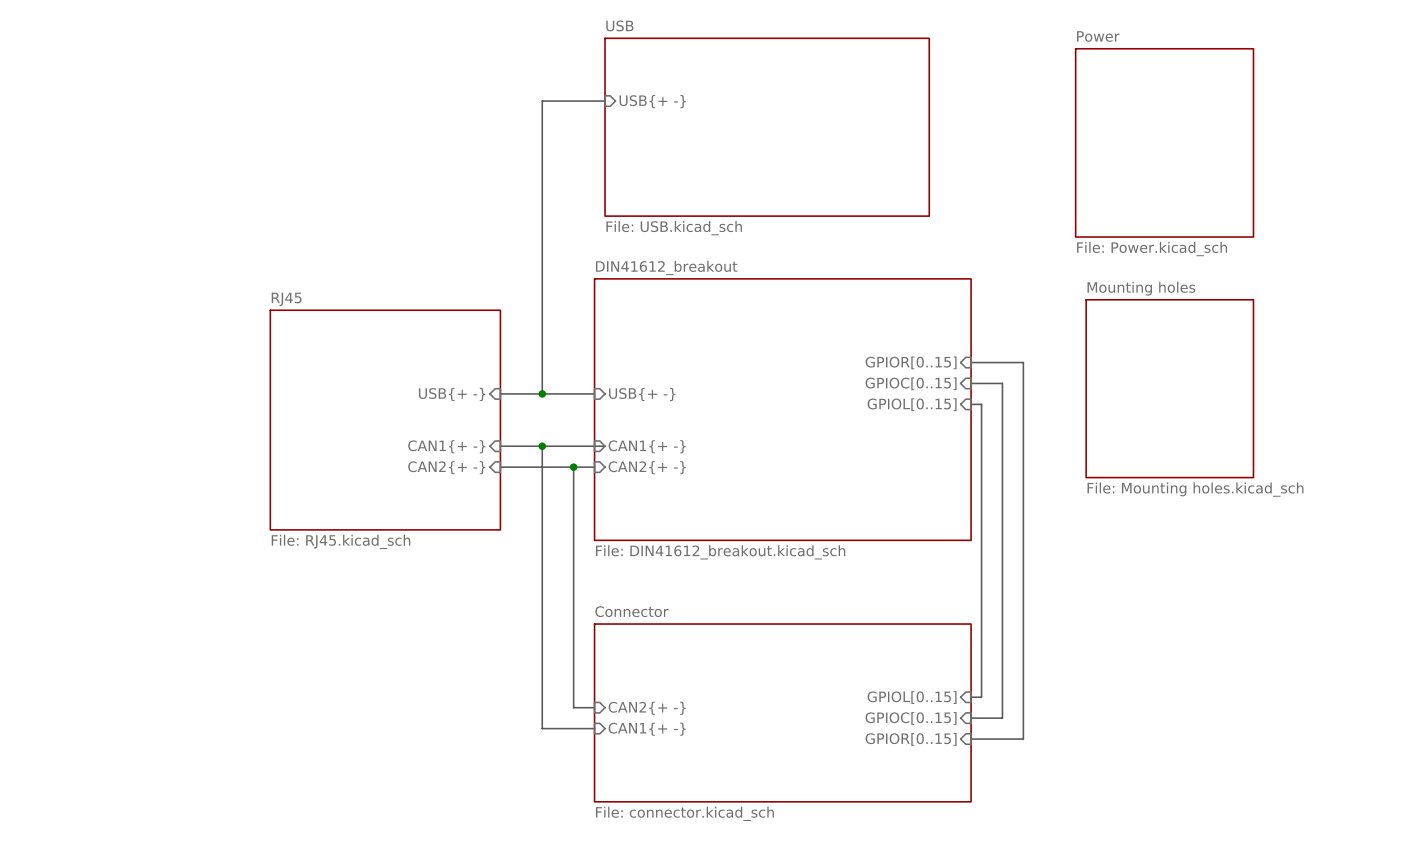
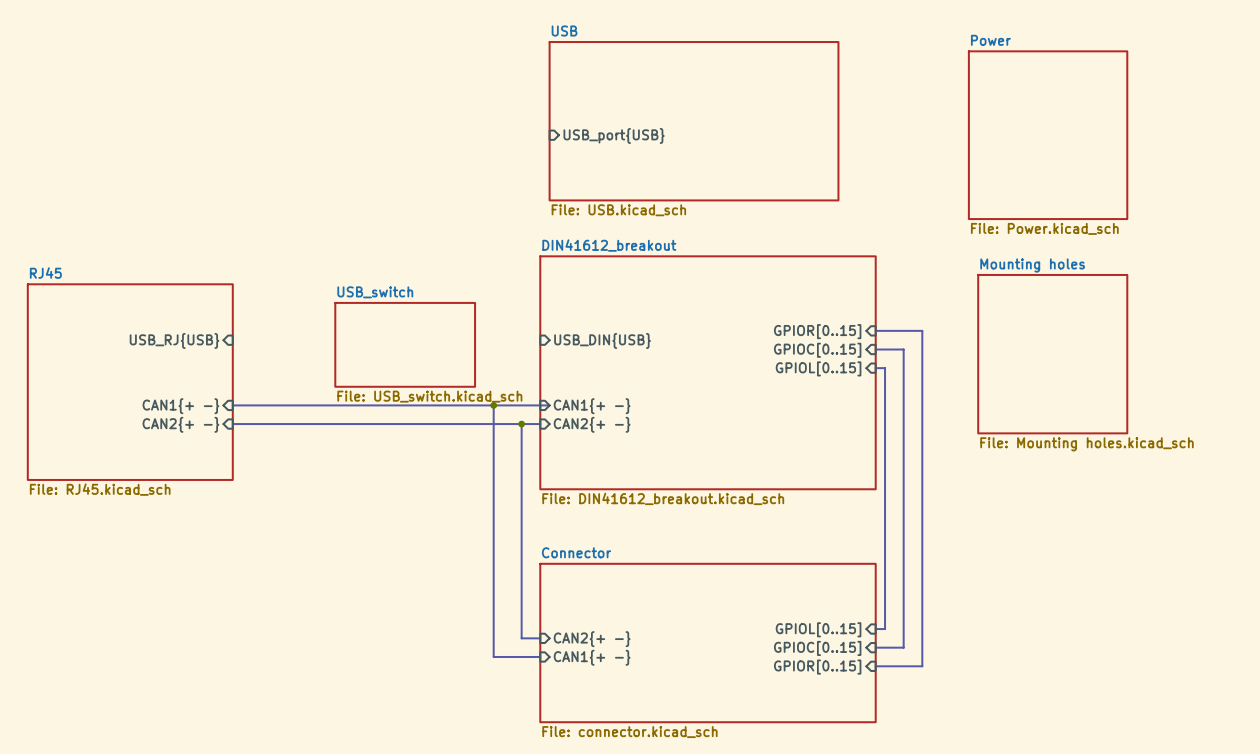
bus: (605, 101) (542, 101) (542, 393) -> none
sheet pin: USB{+ -} (652, 101) -> none
sheet pin: none -> USB_port{USB} (614, 135)
sheet pin: none -> USB_RJ{USB} (174, 340)
sheet pin: none -> USB_DIN{USB} (602, 340)
sheet USB_switch: none -> File: USB_switch.kicad_sch (405, 344)
bus: (500, 393) (594, 393) -> none
junction: (542, 393) -> none
sheet pin: USB{+ -} (452, 394) -> none
sheet pin: USB{+ -} (642, 394) -> none
sheet RJ45 position: (385, 420) -> (130, 382)
sheet pin: none -> CAN1{+ -} (180, 406)
bus: none -> (232, 405) (456, 405)
sheet pin: CAN1{+ -} (446, 446) -> none
sheet pin: none -> CAN2{+ -} (180, 424)
bus: none -> (232, 424) (456, 424)
sheet pin: CAN2{+ -} (446, 467) -> none

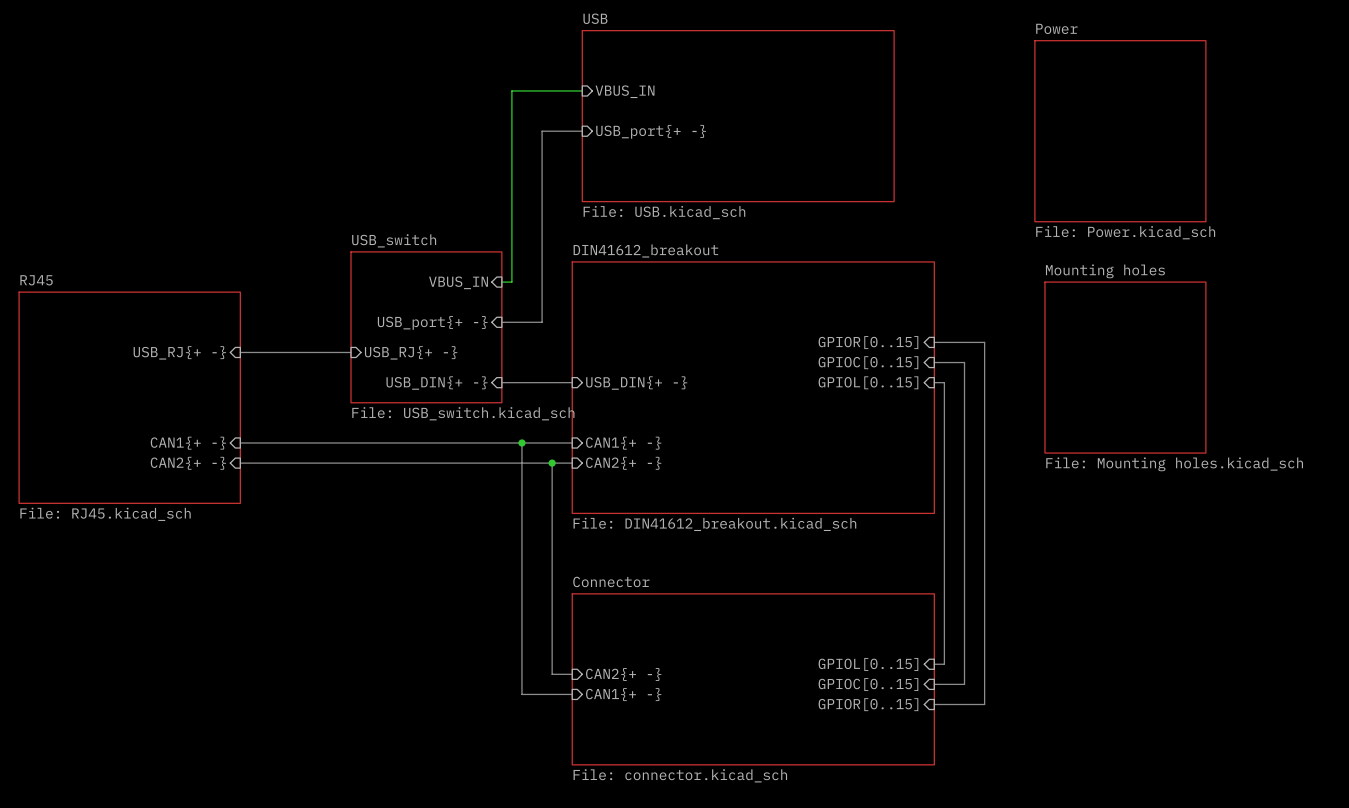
wire: none -> (582, 90) (511, 90) (511, 282) (501, 282)
sheet pin: none -> VBUS_IN (625, 91)
bus: none -> (582, 131) (542, 131) (542, 322) (501, 322)
sheet pin: USB_port{USB} (614, 135) -> USB_port{+ -} (651, 131)
sheet pin: none -> VBUS_IN (458, 282)
sheet pin: none -> USB_port{+ -} (432, 322)
sheet USB_switch: none -> File: USB_switch.kicad_sch (426, 327)
sheet pin: USB_RJ{USB} (174, 340) -> USB_RJ{+ -} (179, 352)
bus: none -> (240, 352) (350, 352)
sheet pin: none -> USB_RJ{+ -} (411, 352)
sheet pin: USB_DIN{USB} (602, 340) -> none
sheet USB_switch: File: USB_switch.kicad_sch (405, 344) -> none
sheet pin: none -> USB_DIN{+ -} (437, 383)
bus: none -> (501, 382) (572, 382)
sheet pin: none -> USB_DIN{+ -} (636, 383)
bus: (232, 405) (549, 405) -> none
bus: (493, 405) (493, 424) -> none
junction: (493, 405) -> none
sheet pin: CAN1{+ -} (180, 406) -> none
sheet pin: CAN1{+ -} (592, 406) -> none
sheet pin: CAN2{+ -} (180, 424) -> CAN1{+ -} (188, 443)
junction: none -> (521, 442)
bus: (521, 424) (521, 442) -> none
junction: (521, 424) -> none
sheet pin: CAN2{+ -} (592, 424) -> CAN1{+ -} (623, 443)
bus: none -> (240, 463) (572, 463)
junction: none -> (552, 463)
sheet pin: none -> CAN2{+ -} (188, 463)
sheet pin: none -> CAN2{+ -} (623, 463)

